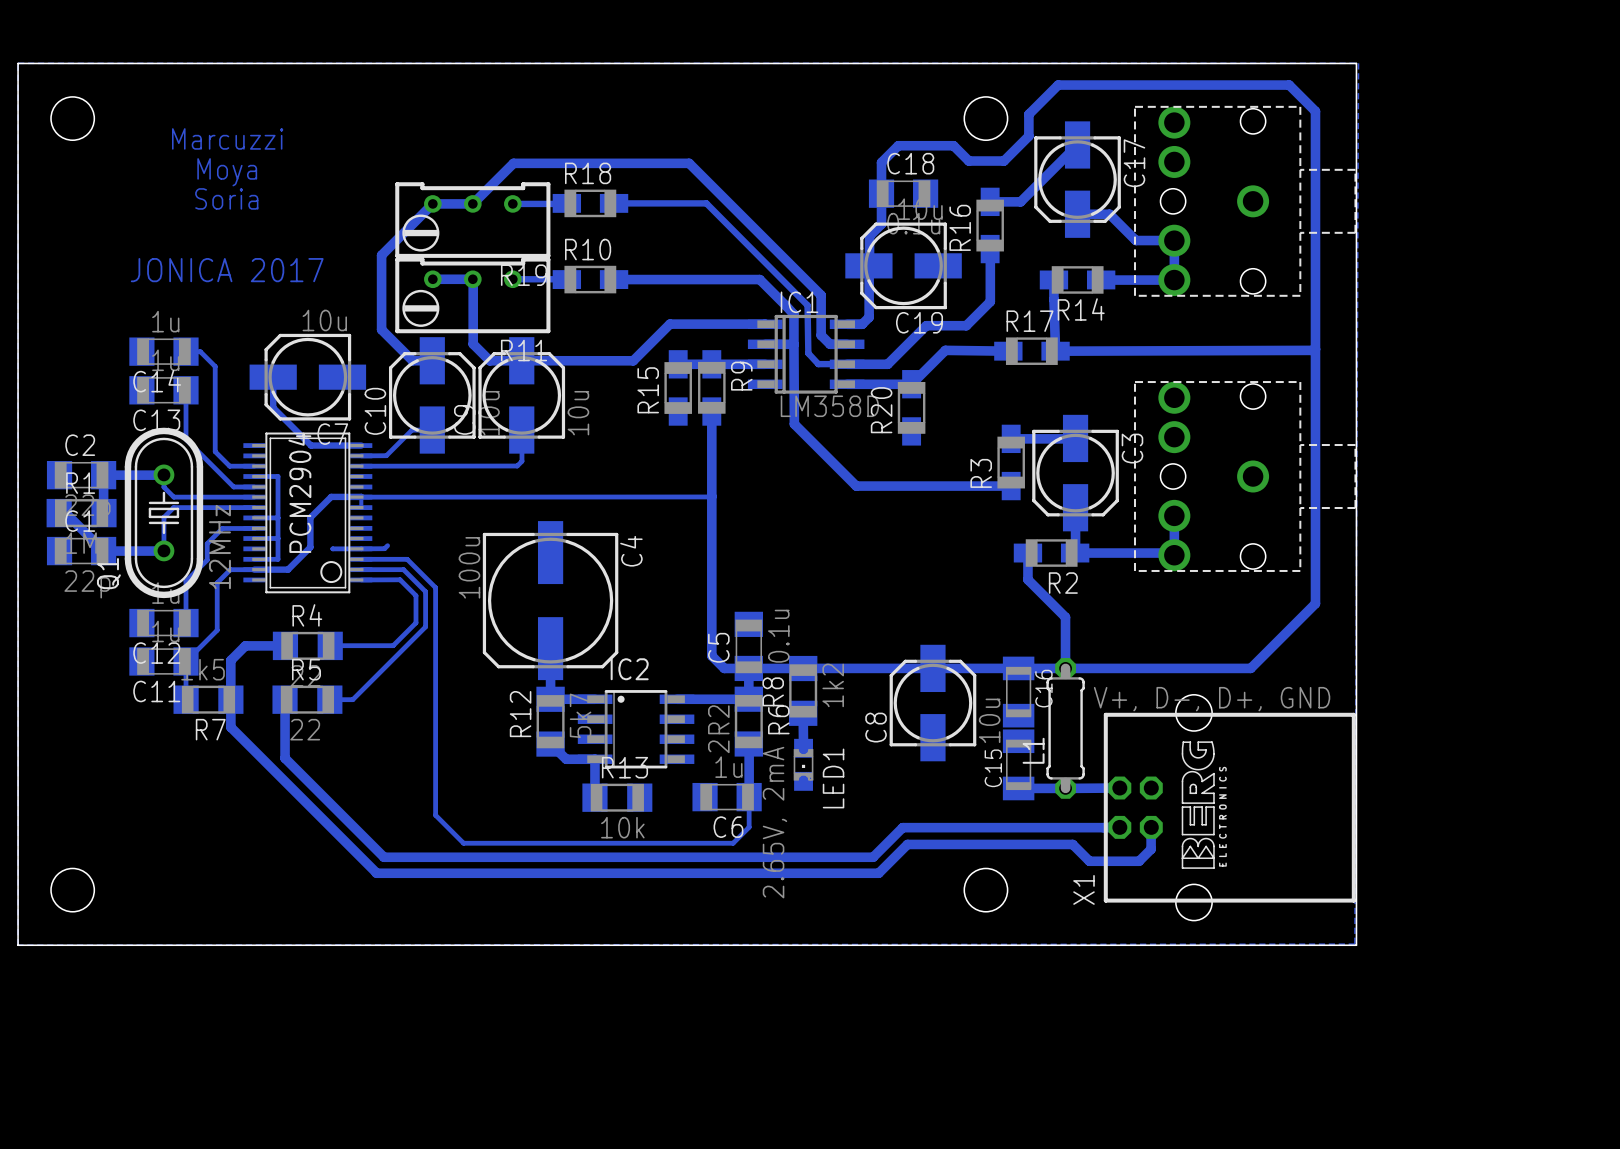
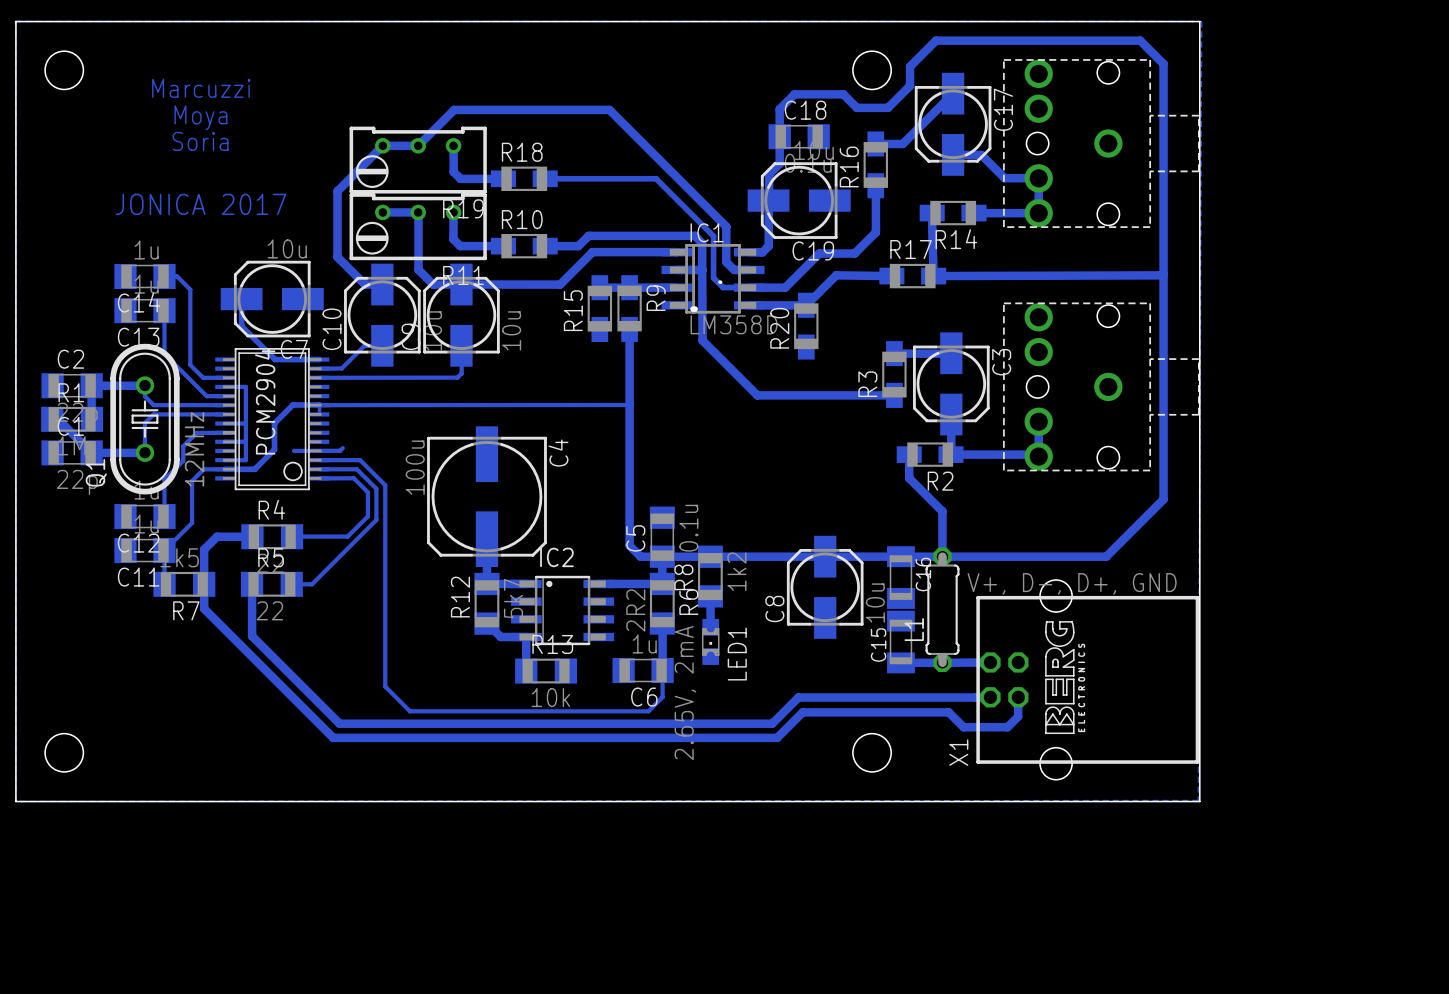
track: (566, 203) (512, 203) -> (503, 178) (460, 178) (453, 172) (453, 145)
R18 position: (590, 203) -> (524, 178)
track: (614, 203) (706, 203) (807, 305) (808, 353) (818, 364) -> (545, 178) (656, 178) (713, 236) (713, 277) (723, 287)
track: (512, 279) (566, 279) -> (453, 212) (453, 239) (460, 246) (503, 246)
R10 position: (590, 279) -> (524, 246)
track: (614, 279) (759, 279) (785, 305) -> (545, 246) (578, 246) (588, 235) (695, 235)
board edge: none -> (720, 282) (719, 282)
board edge: none -> (695, 309) (693, 309)

